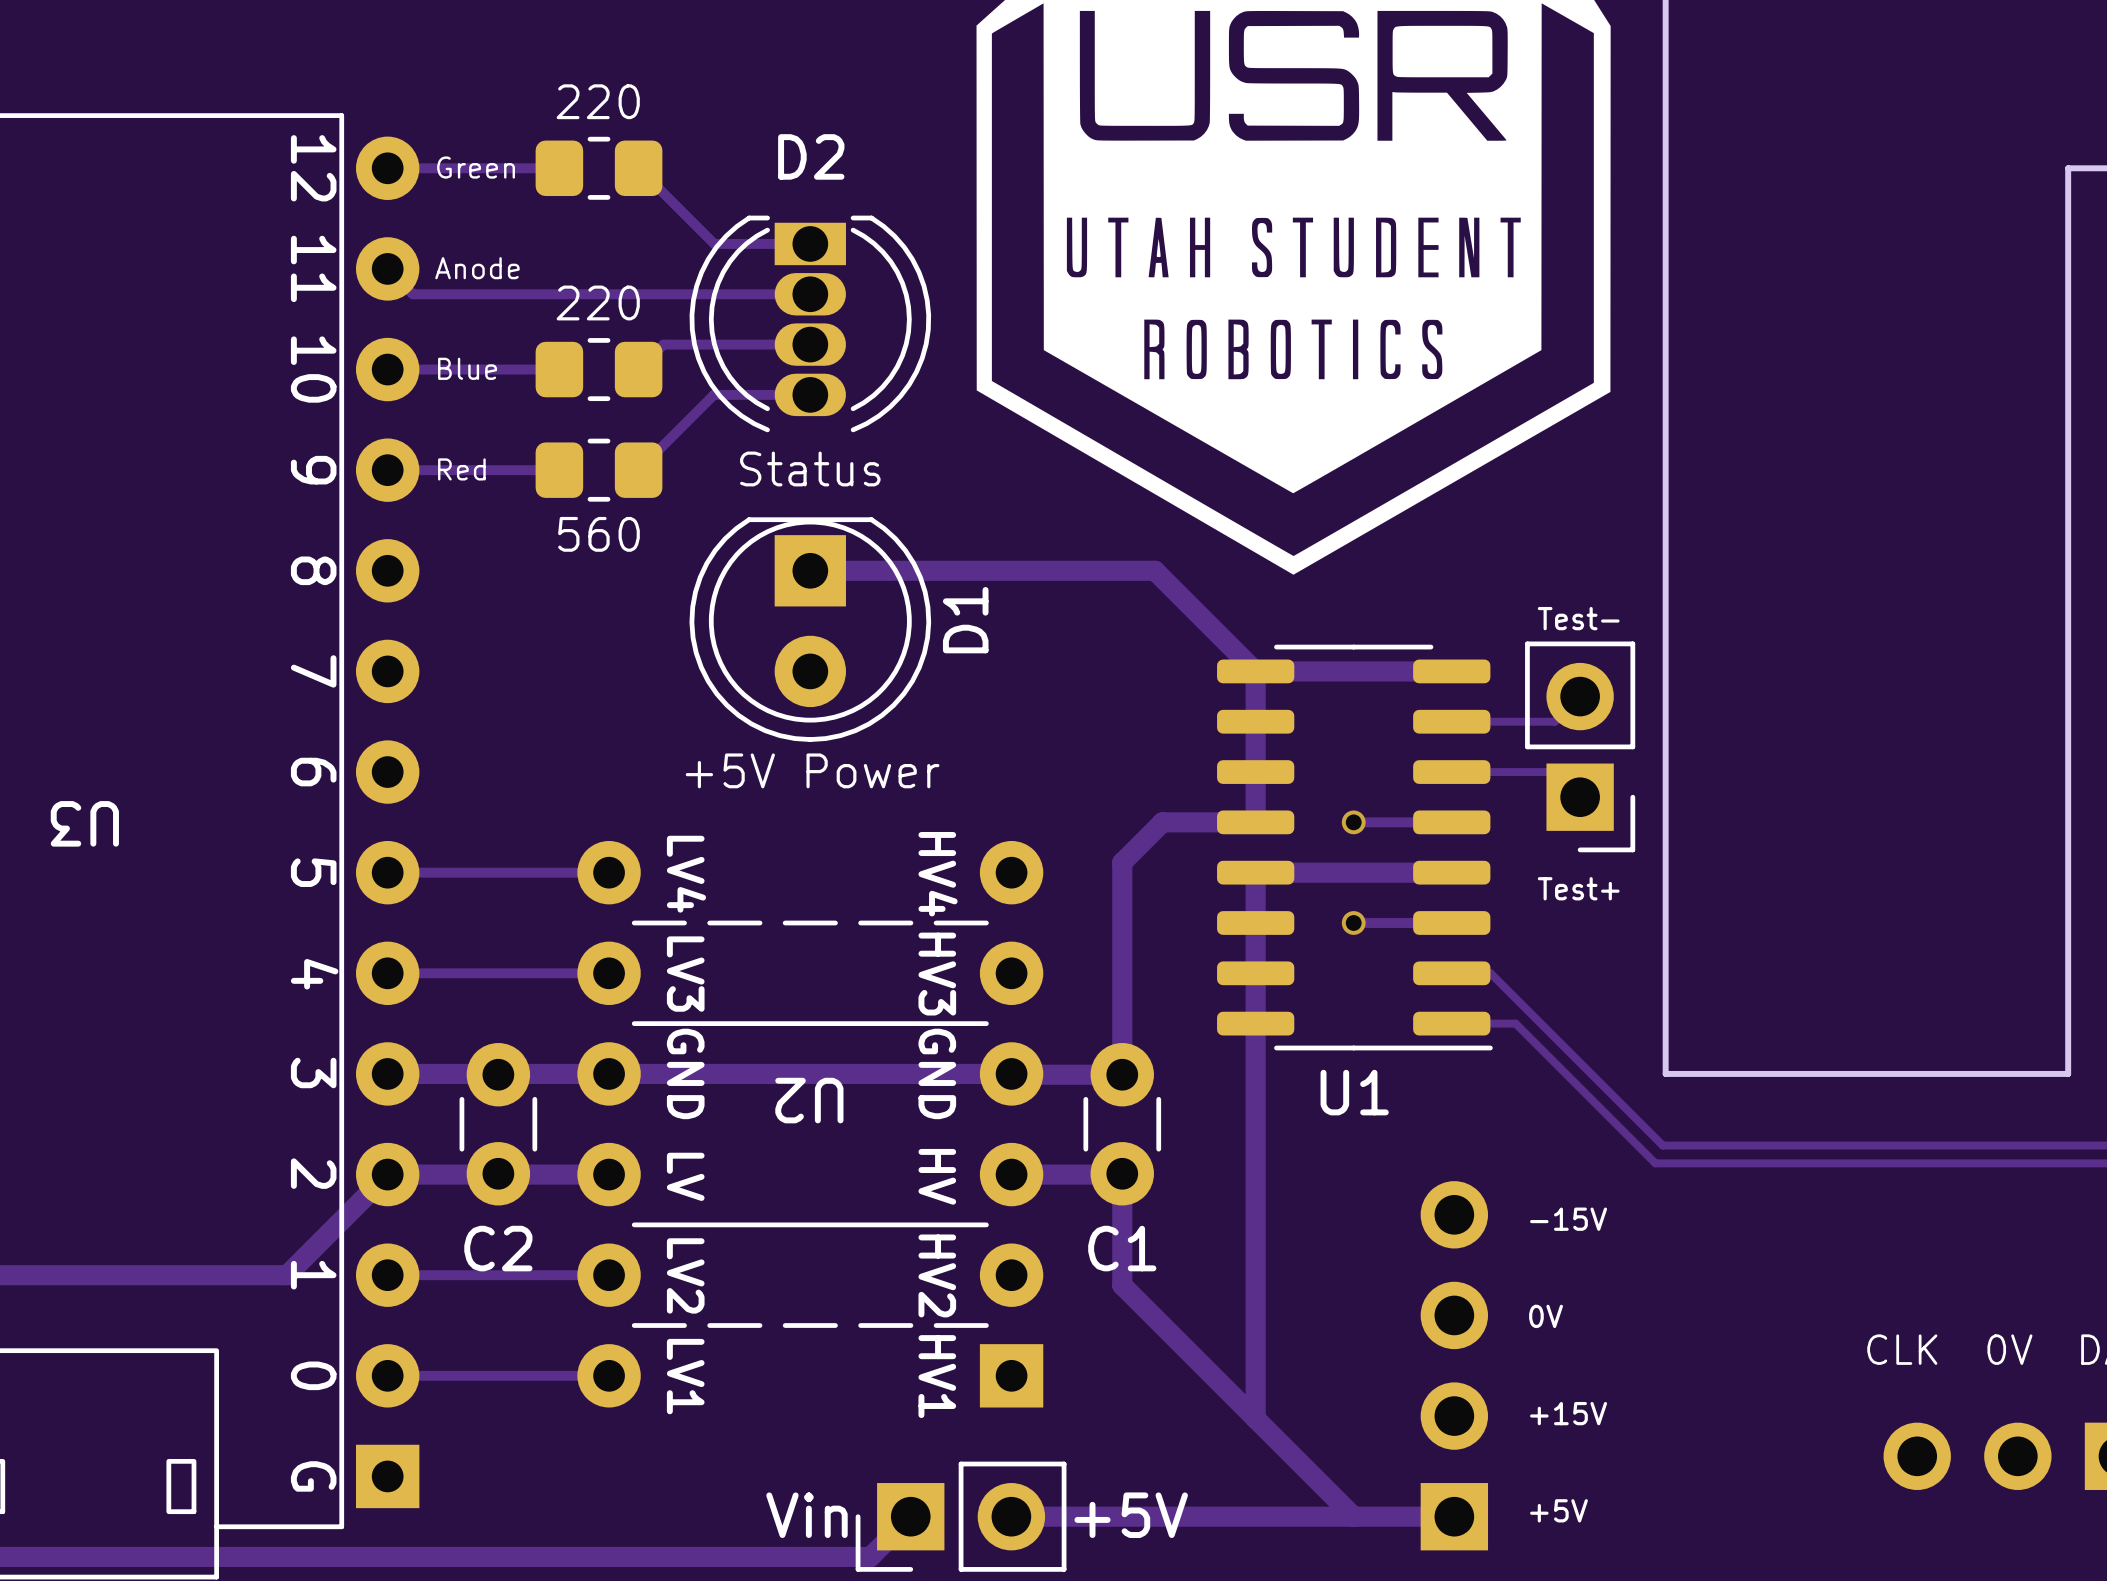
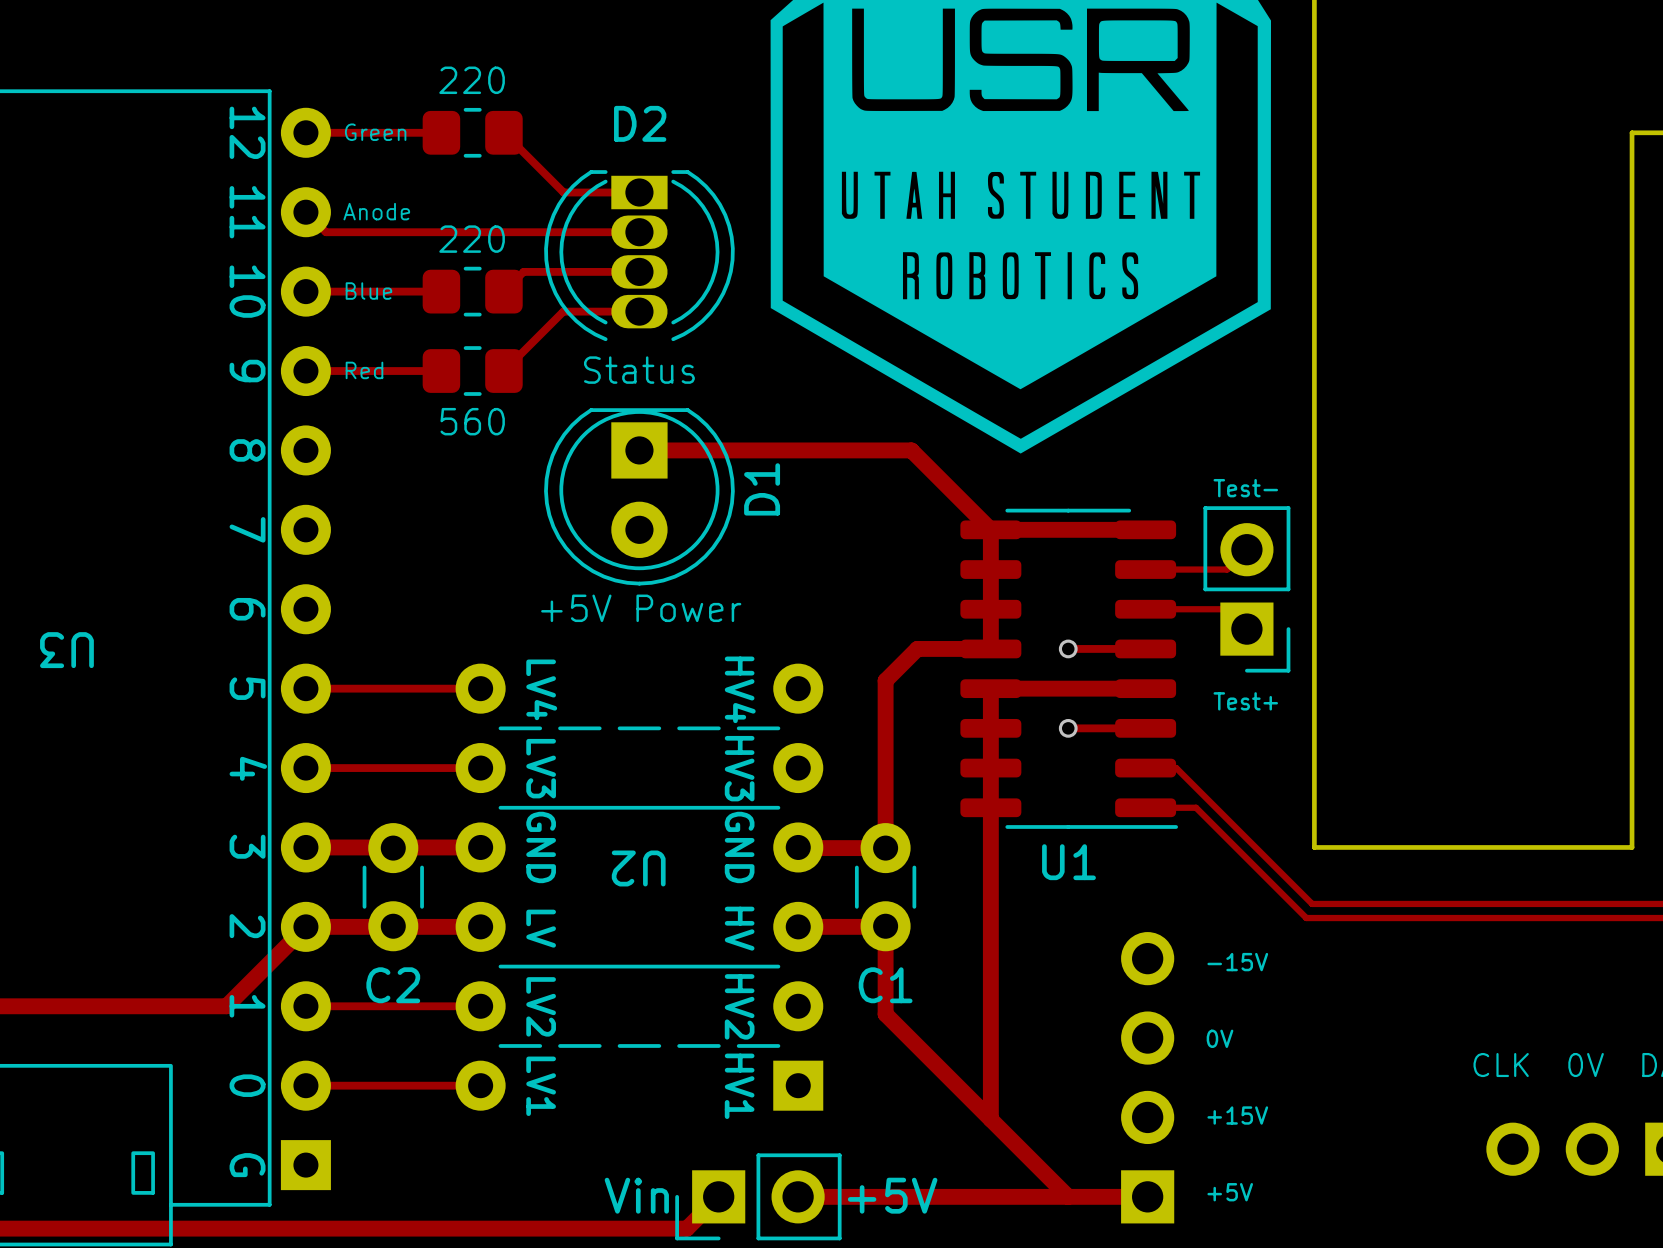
track: (609, 1073) (1011, 1073) -> none

